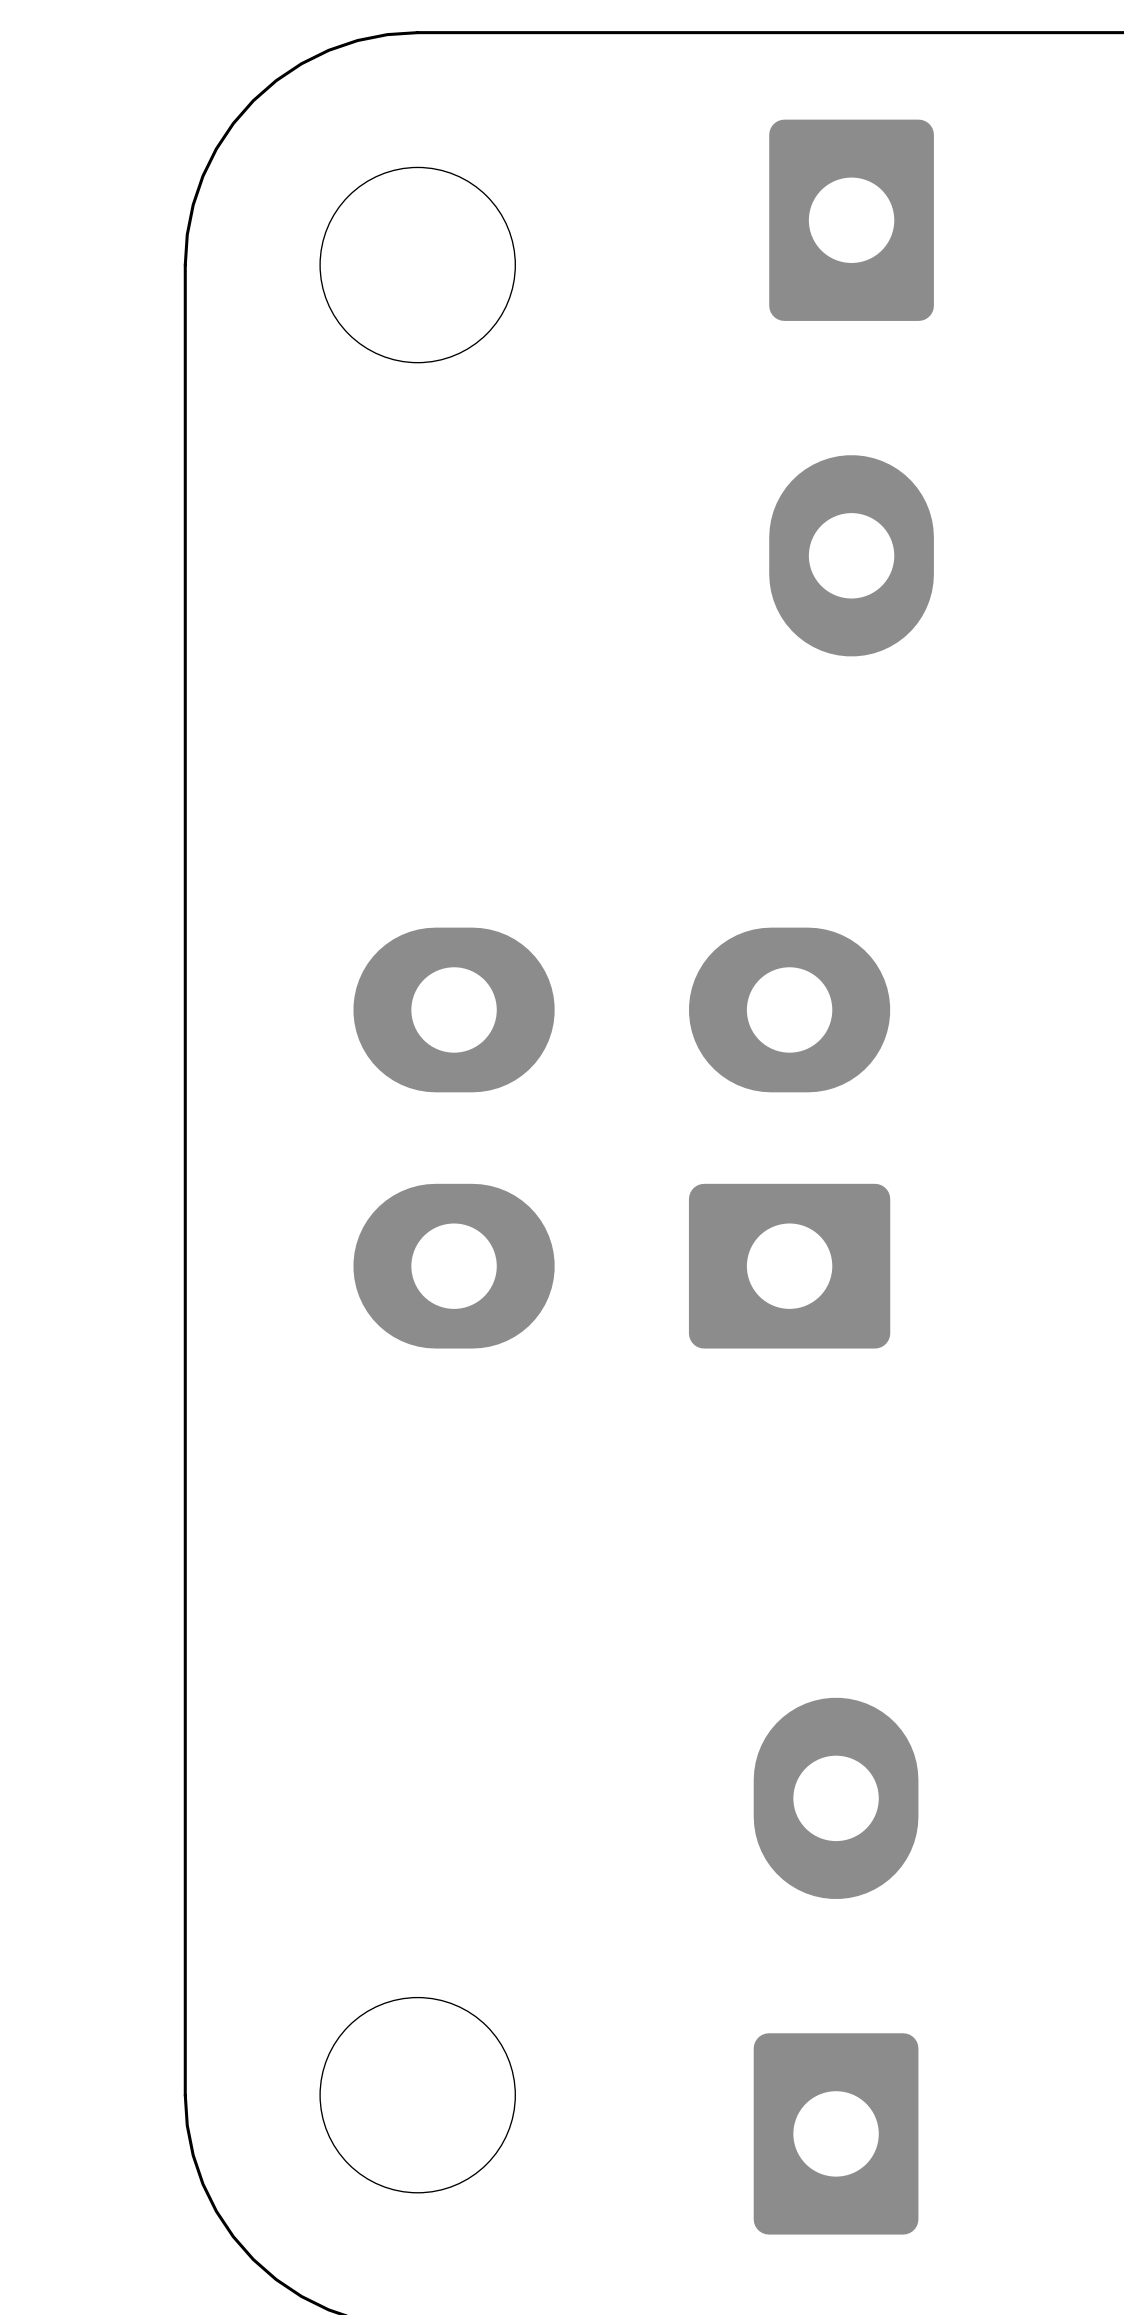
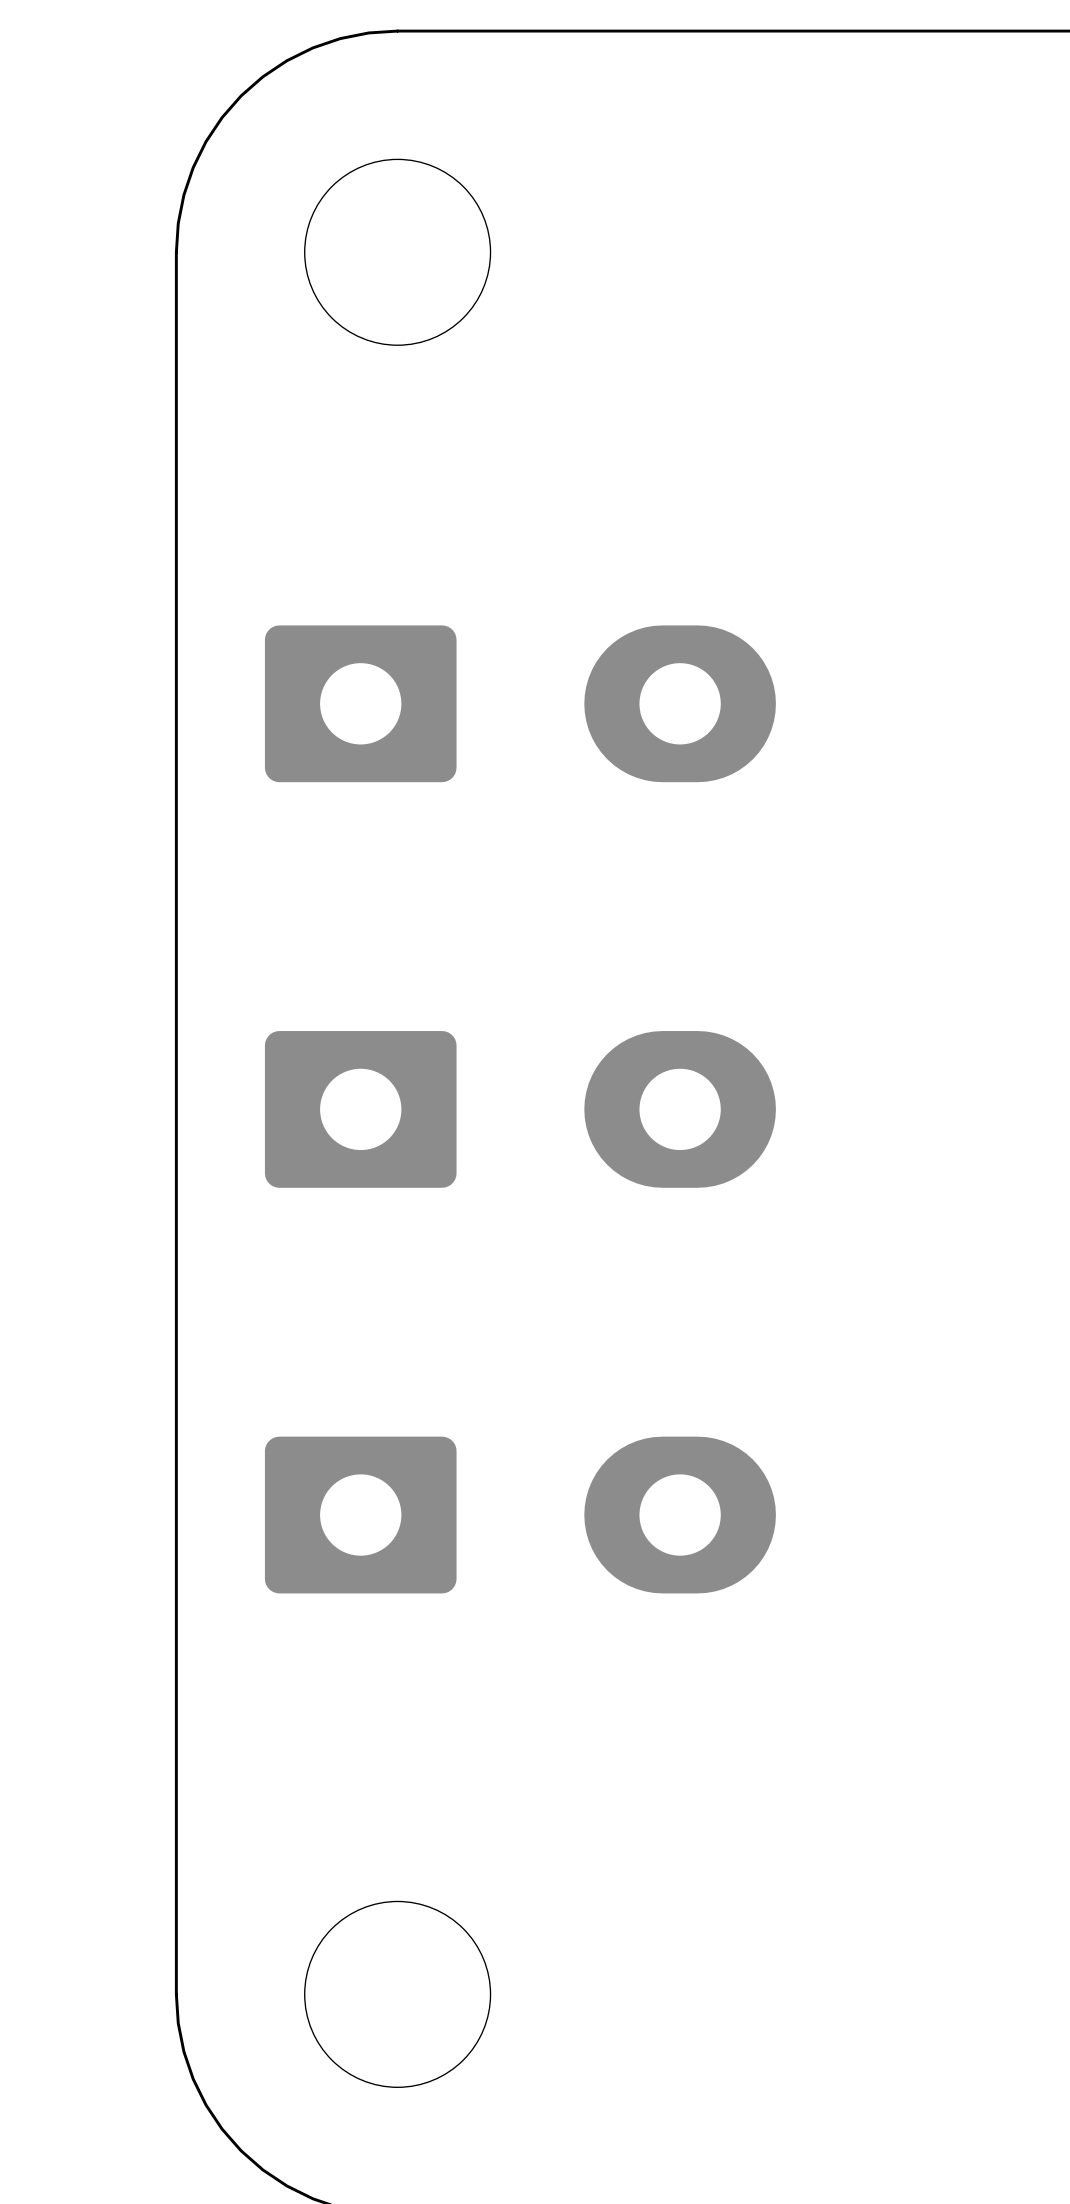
part: (851, 388) -> none
part: none -> (520, 703)
part: (621, 1138) -> none
part: none -> (520, 1109)
part: none -> (520, 1515)
part: (836, 1966) -> none

